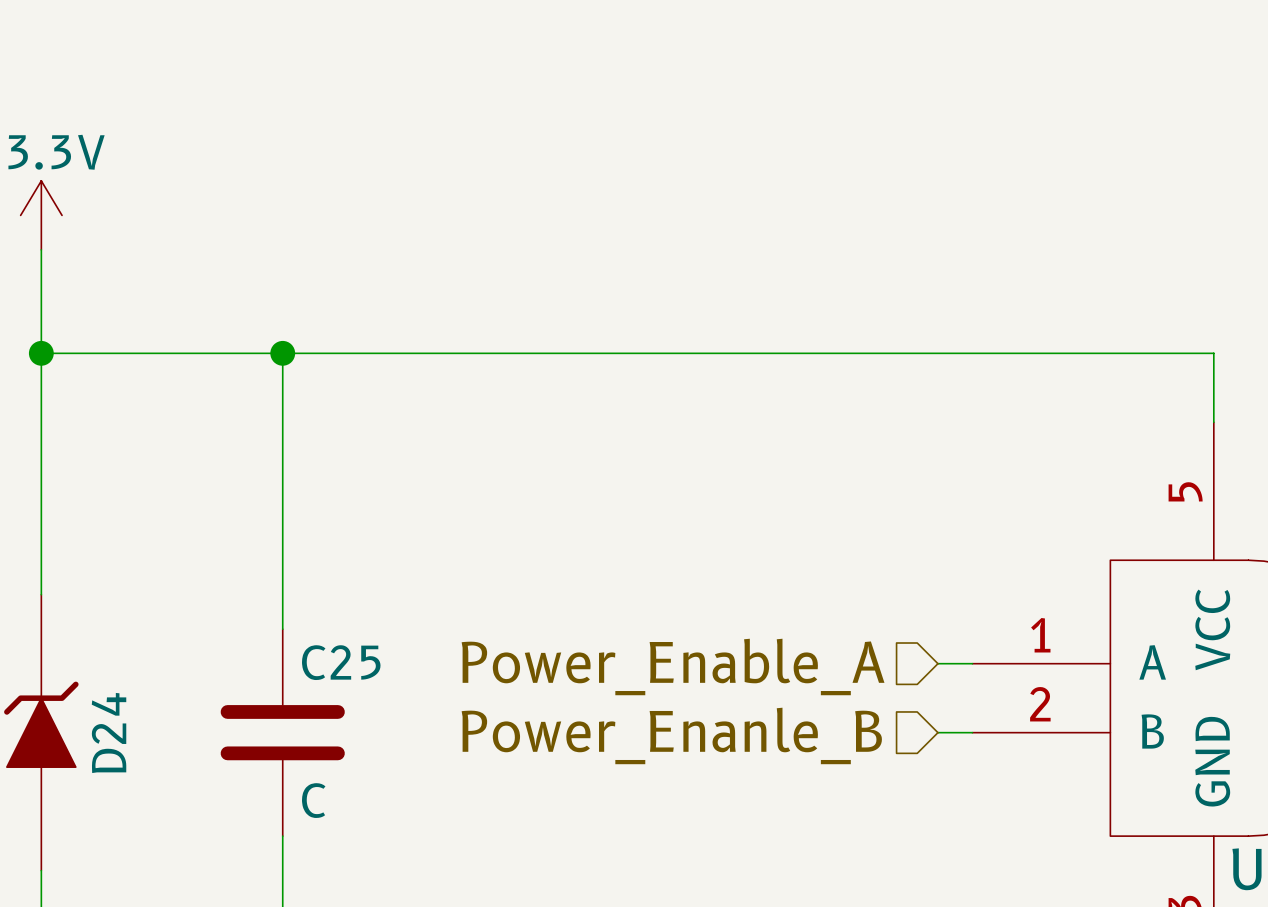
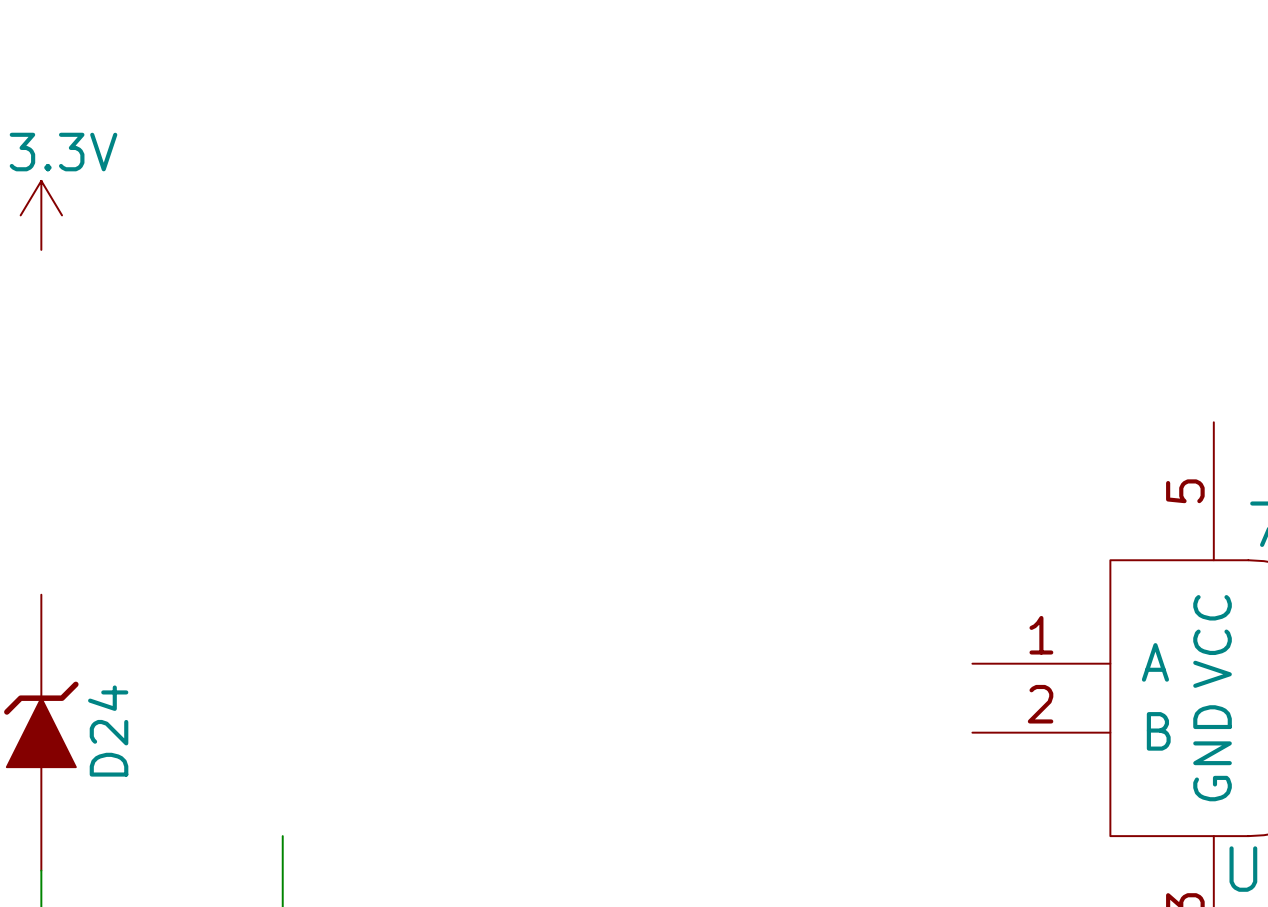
wire: (41, 249) (41, 594) -> none
wire: (41, 353) (1213, 353) (1213, 422) -> none
junction: (41, 353) -> none
wire: (282, 353) (282, 629) -> none
junction: (282, 353) -> none
wire: (937, 663) (972, 663) -> none
hierarchical label: Power_Enable_A (673, 666) -> none
C25: C (282, 732) -> none
wire: (937, 732) (972, 732) -> none
hierarchical label: Power_Enanle_B (671, 735) -> none

